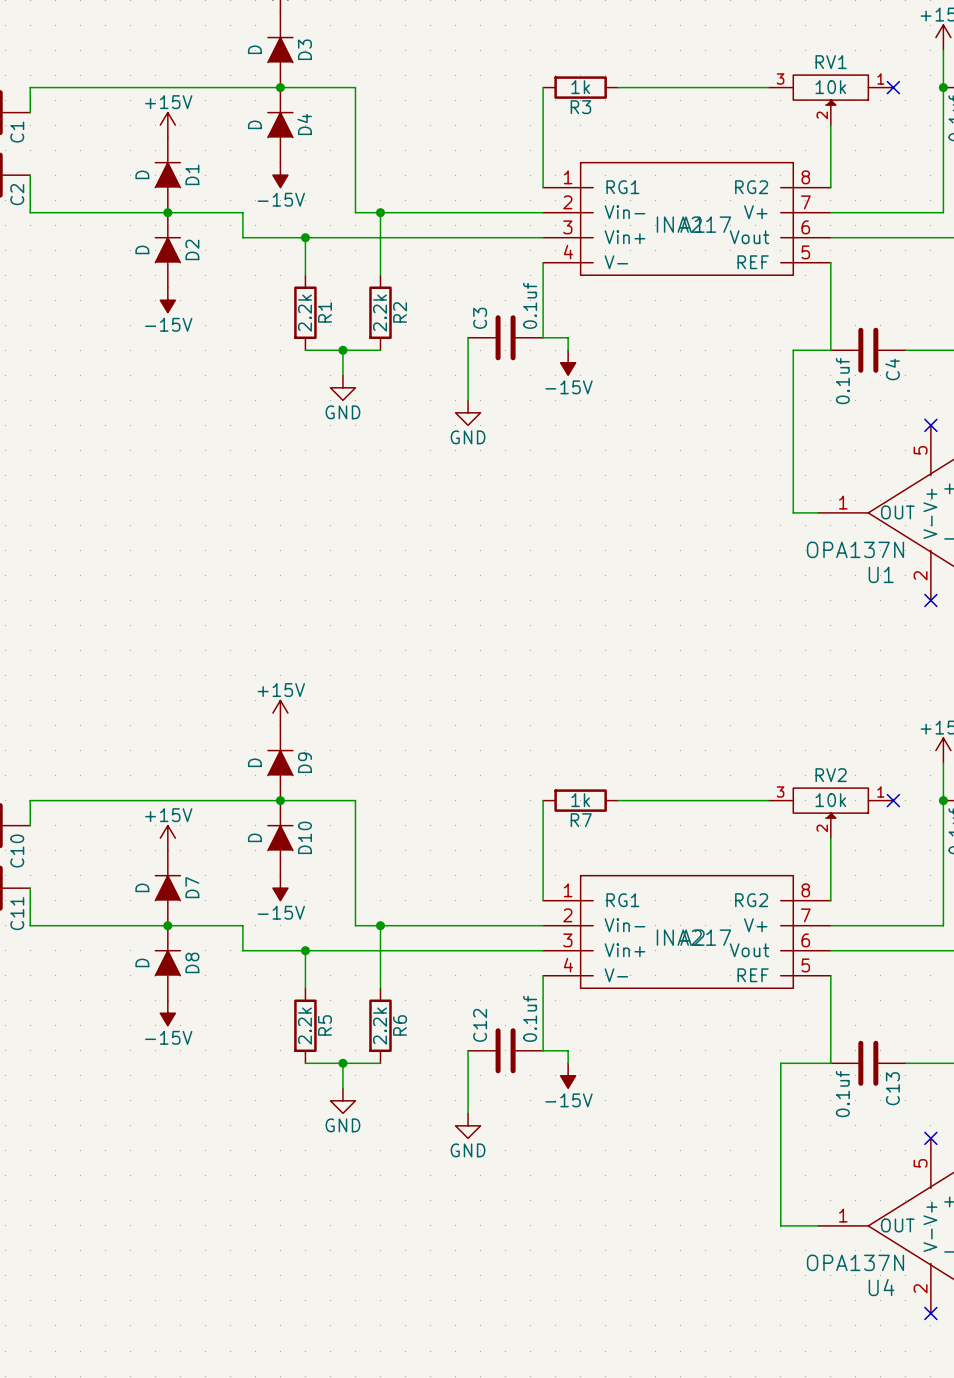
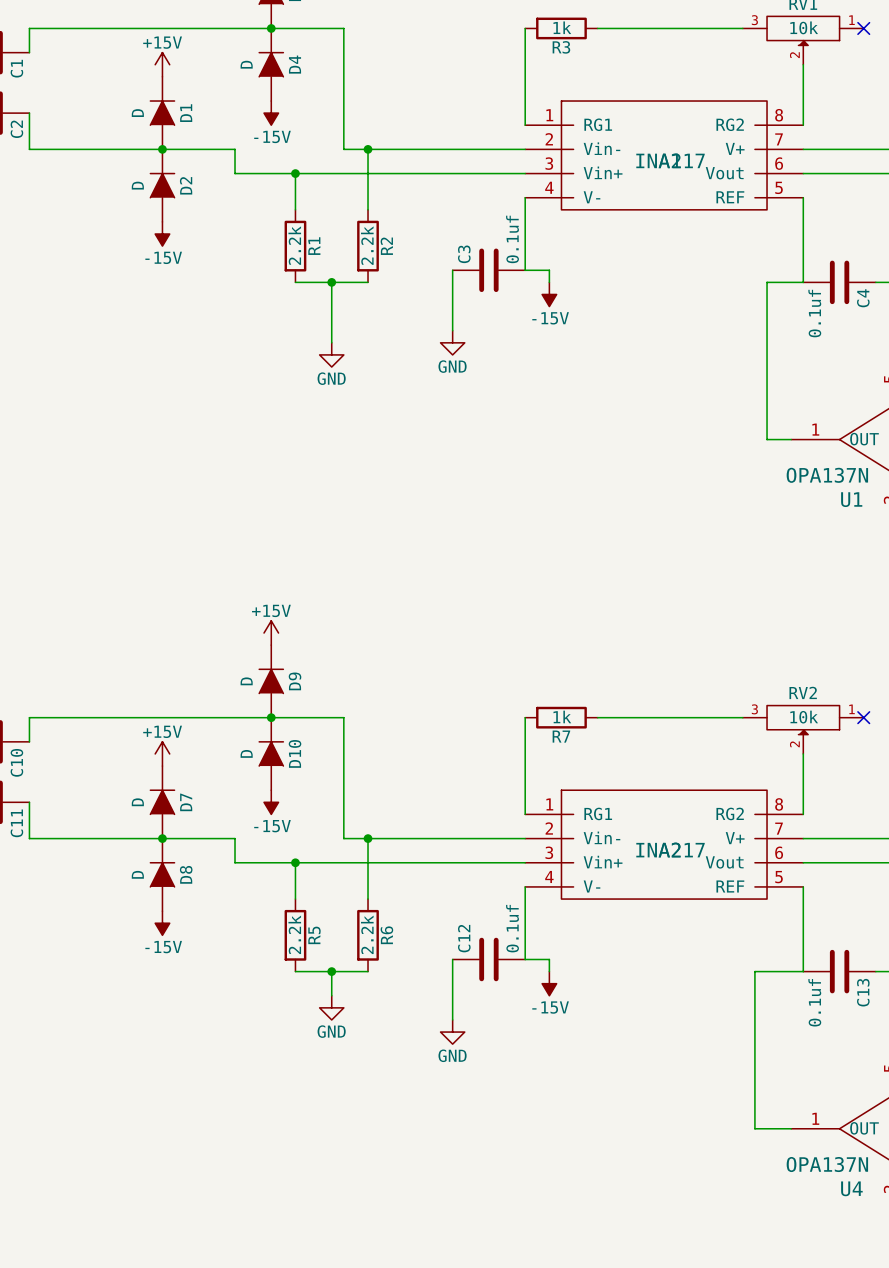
wire: none -> (331, 306) (331, 342)
power symbol position: GND (342, 387) -> GND (331, 354)

